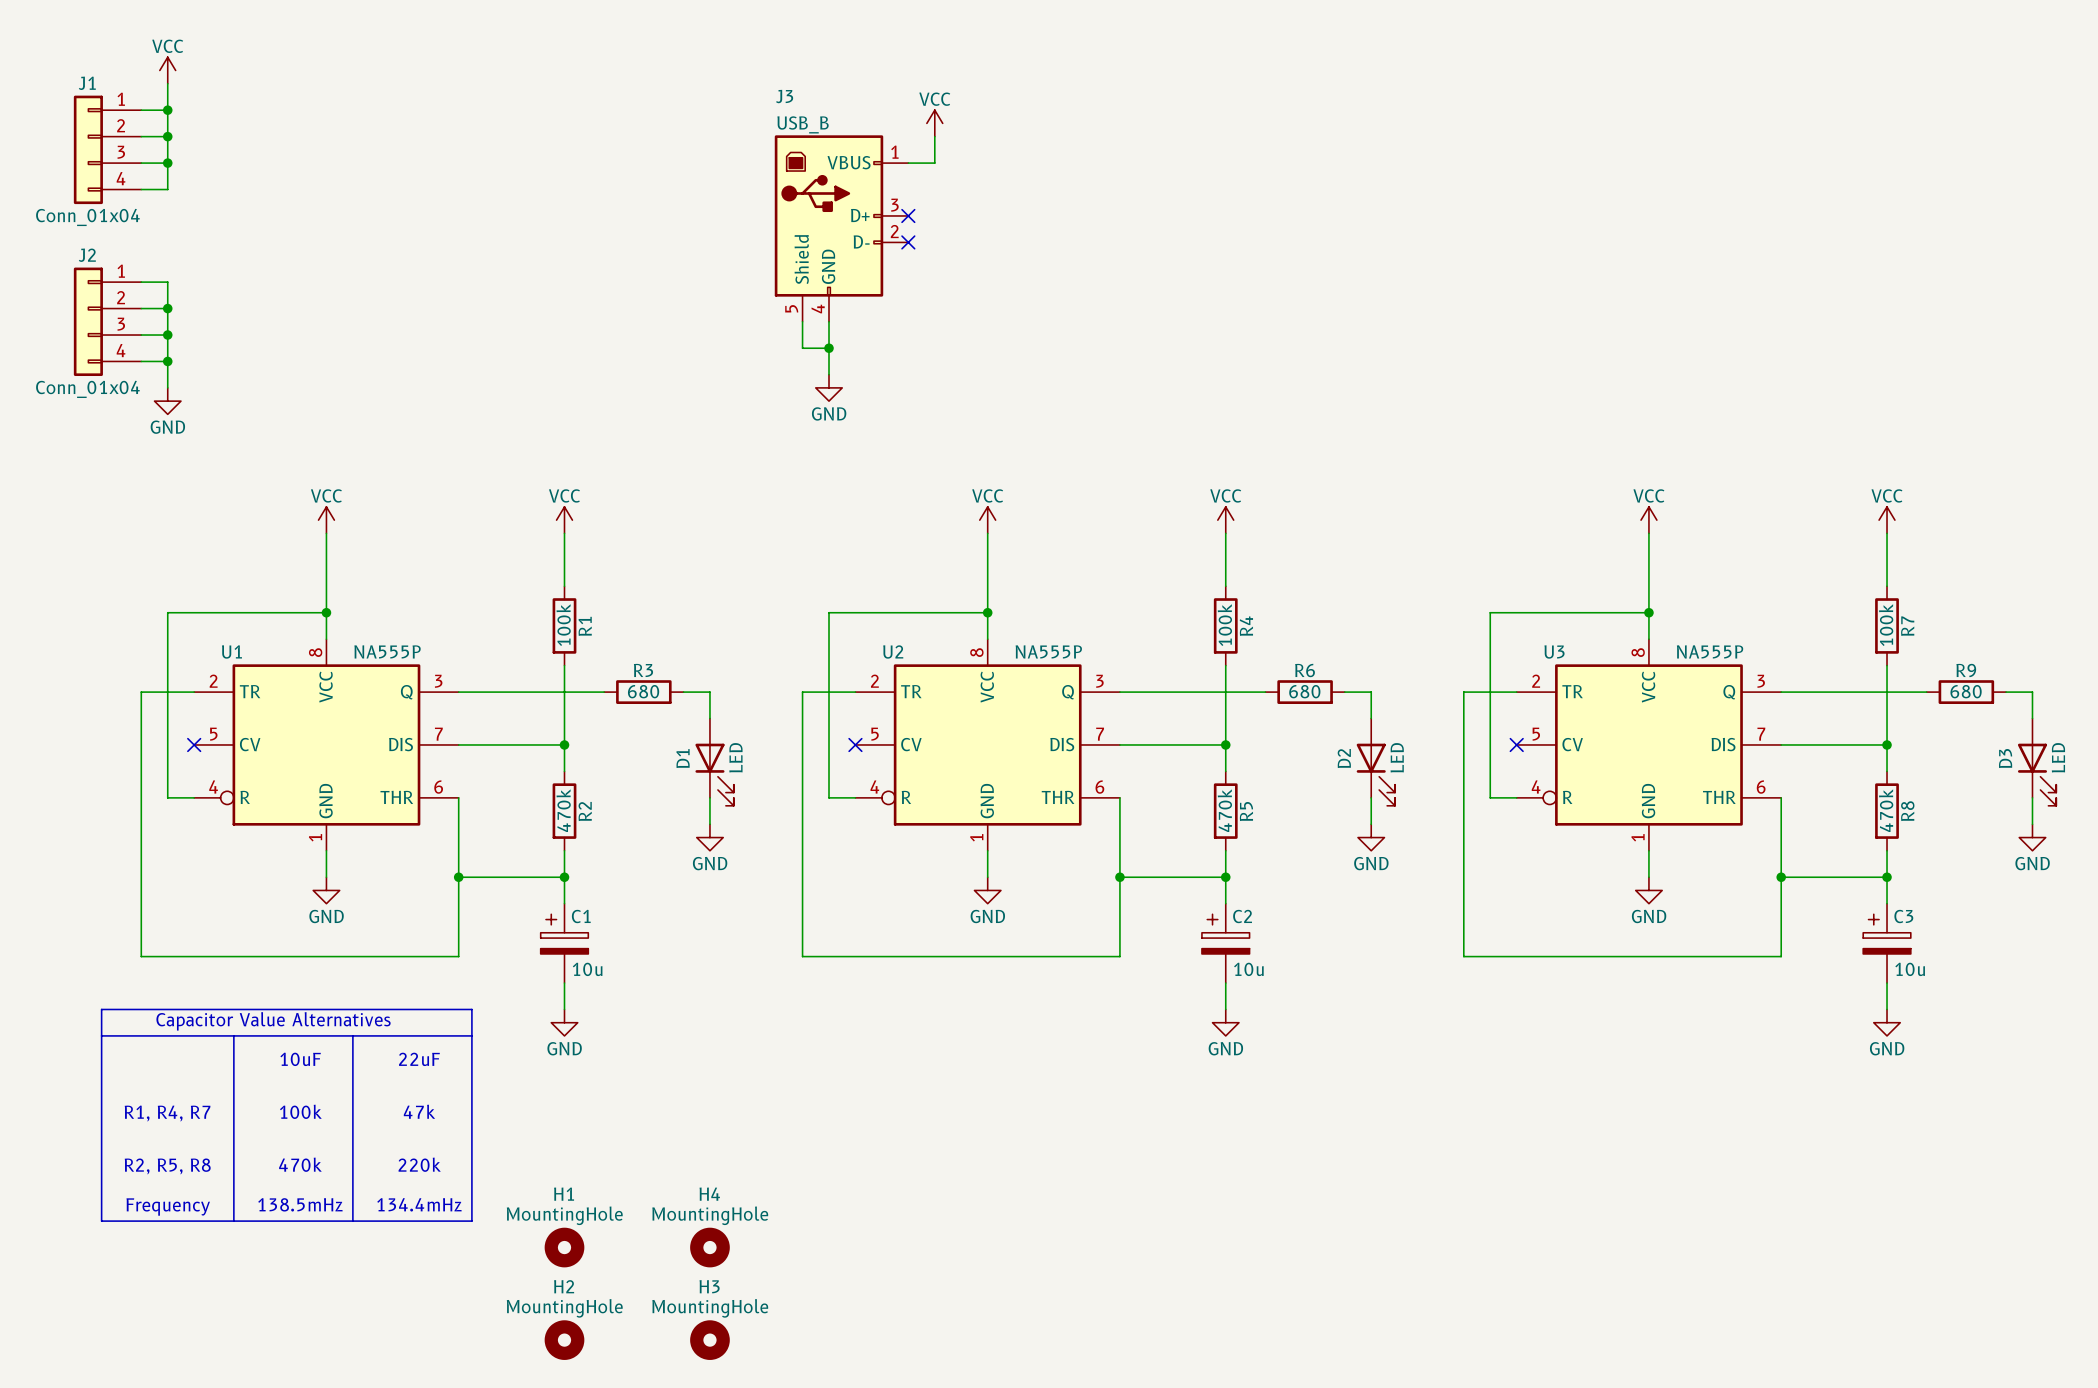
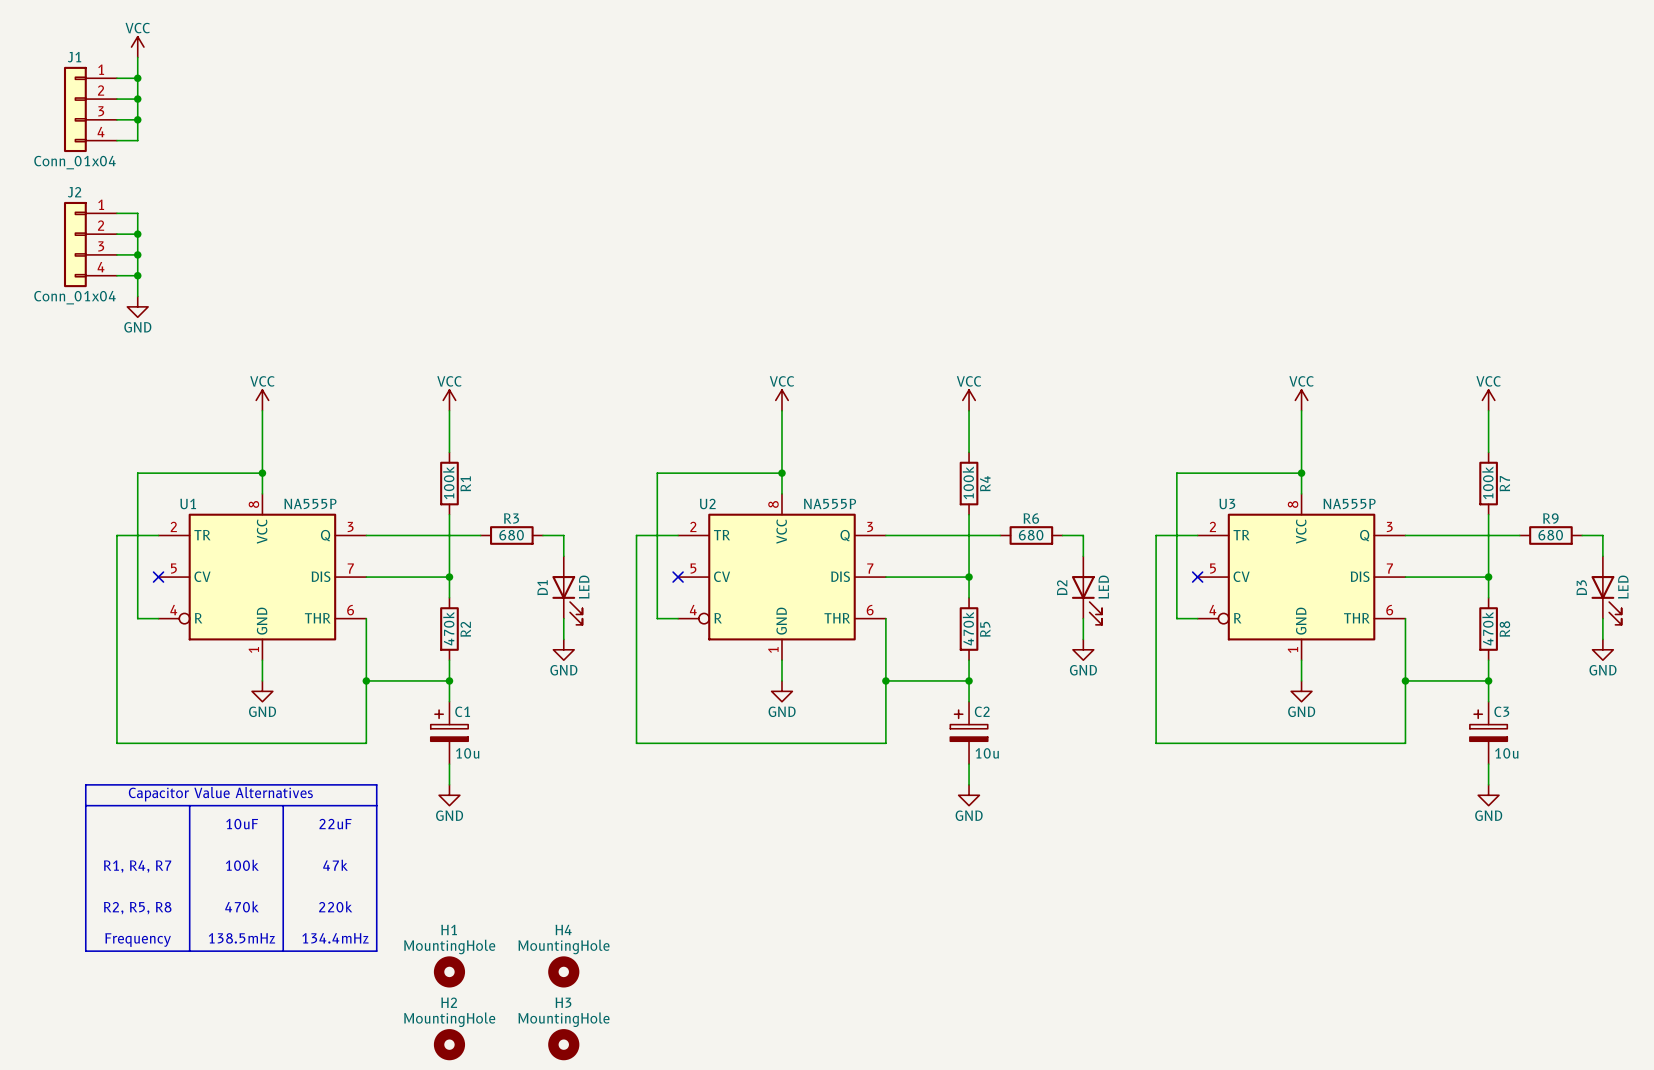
power symbol: VCC (934, 123) -> none
wire: (934, 136) (934, 163) (908, 163) -> none
no-connect mark: (908, 215) -> none
J3: USB_B (841, 228) -> none
no-connect mark: (908, 242) -> none
wire: (802, 321) (802, 348) (829, 348) -> none
wire: (829, 321) (829, 374) -> none
junction: (829, 348) -> none
power symbol: GND (829, 387) -> none

